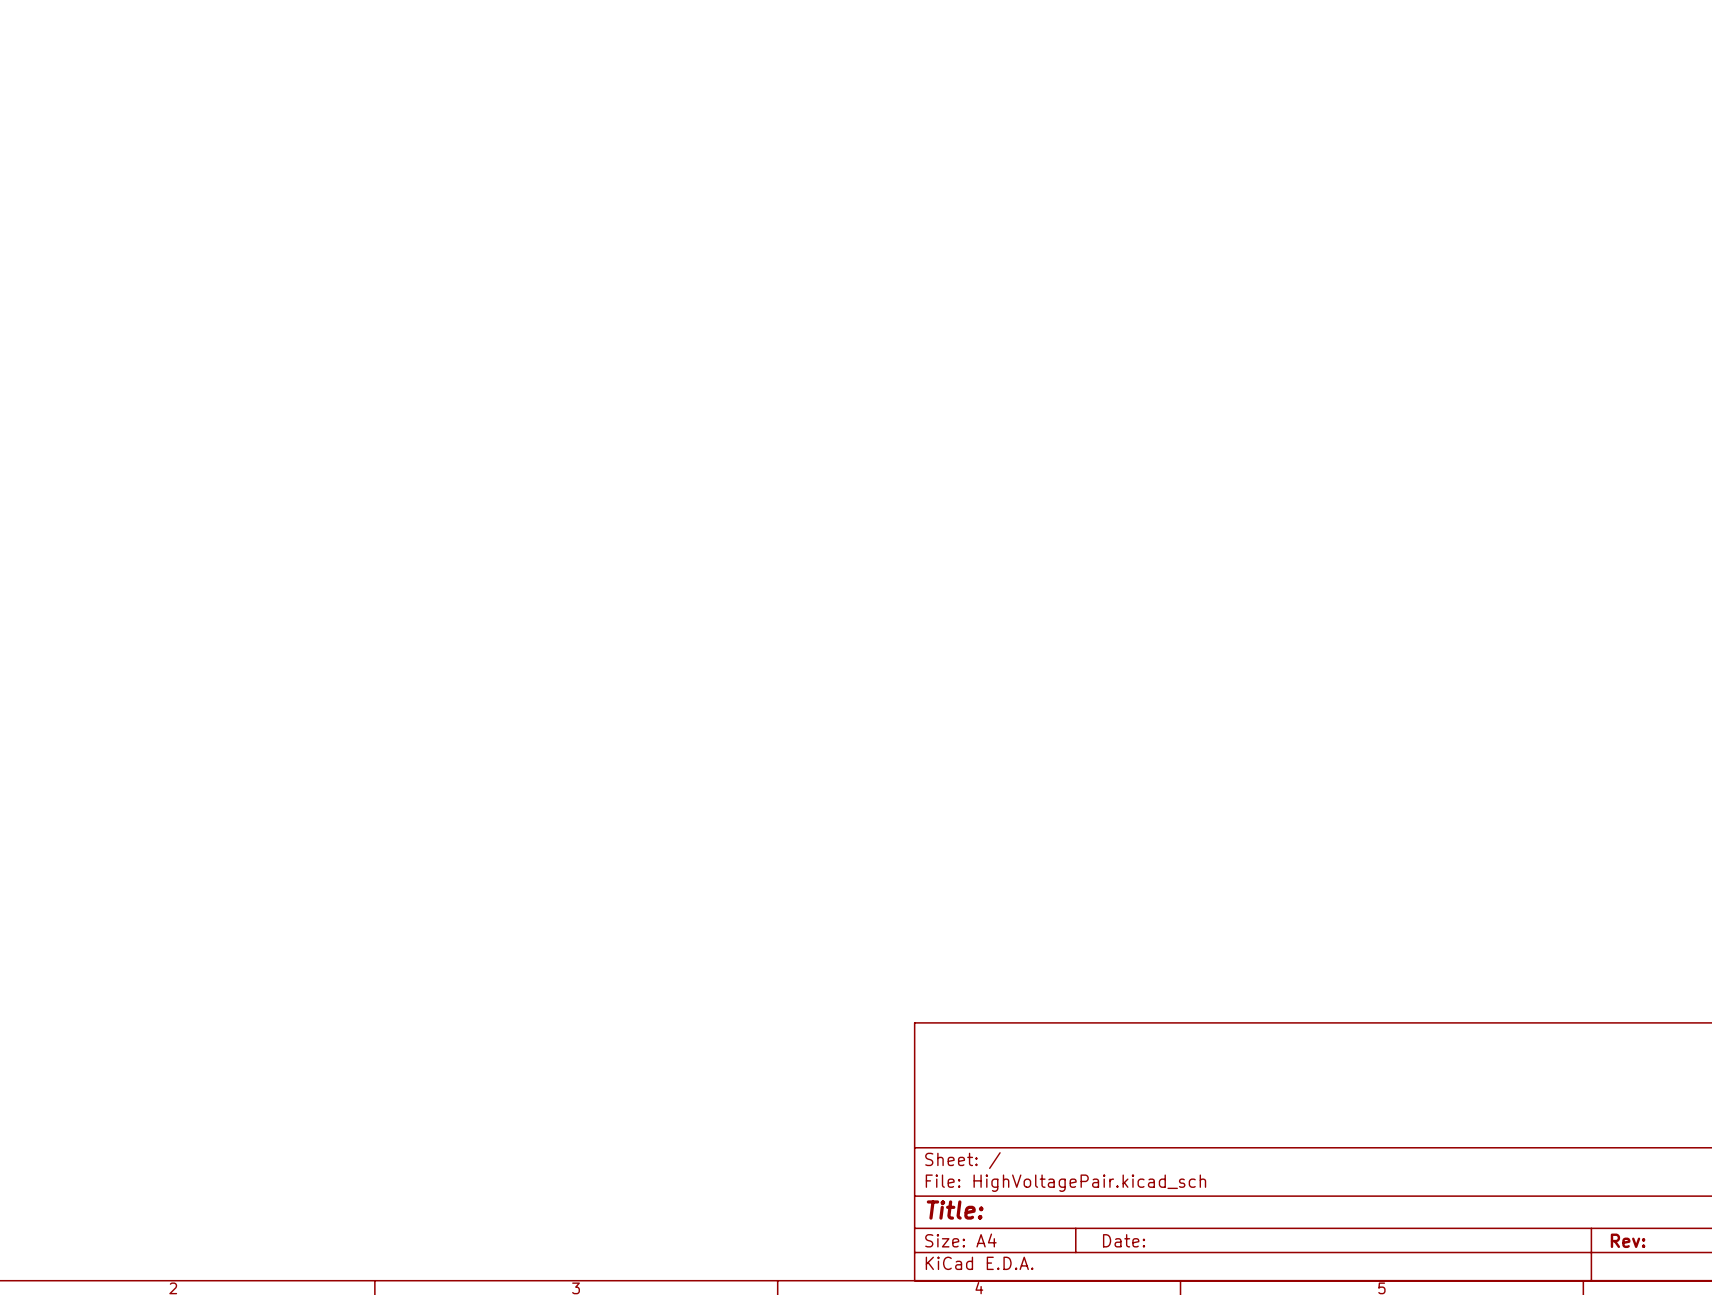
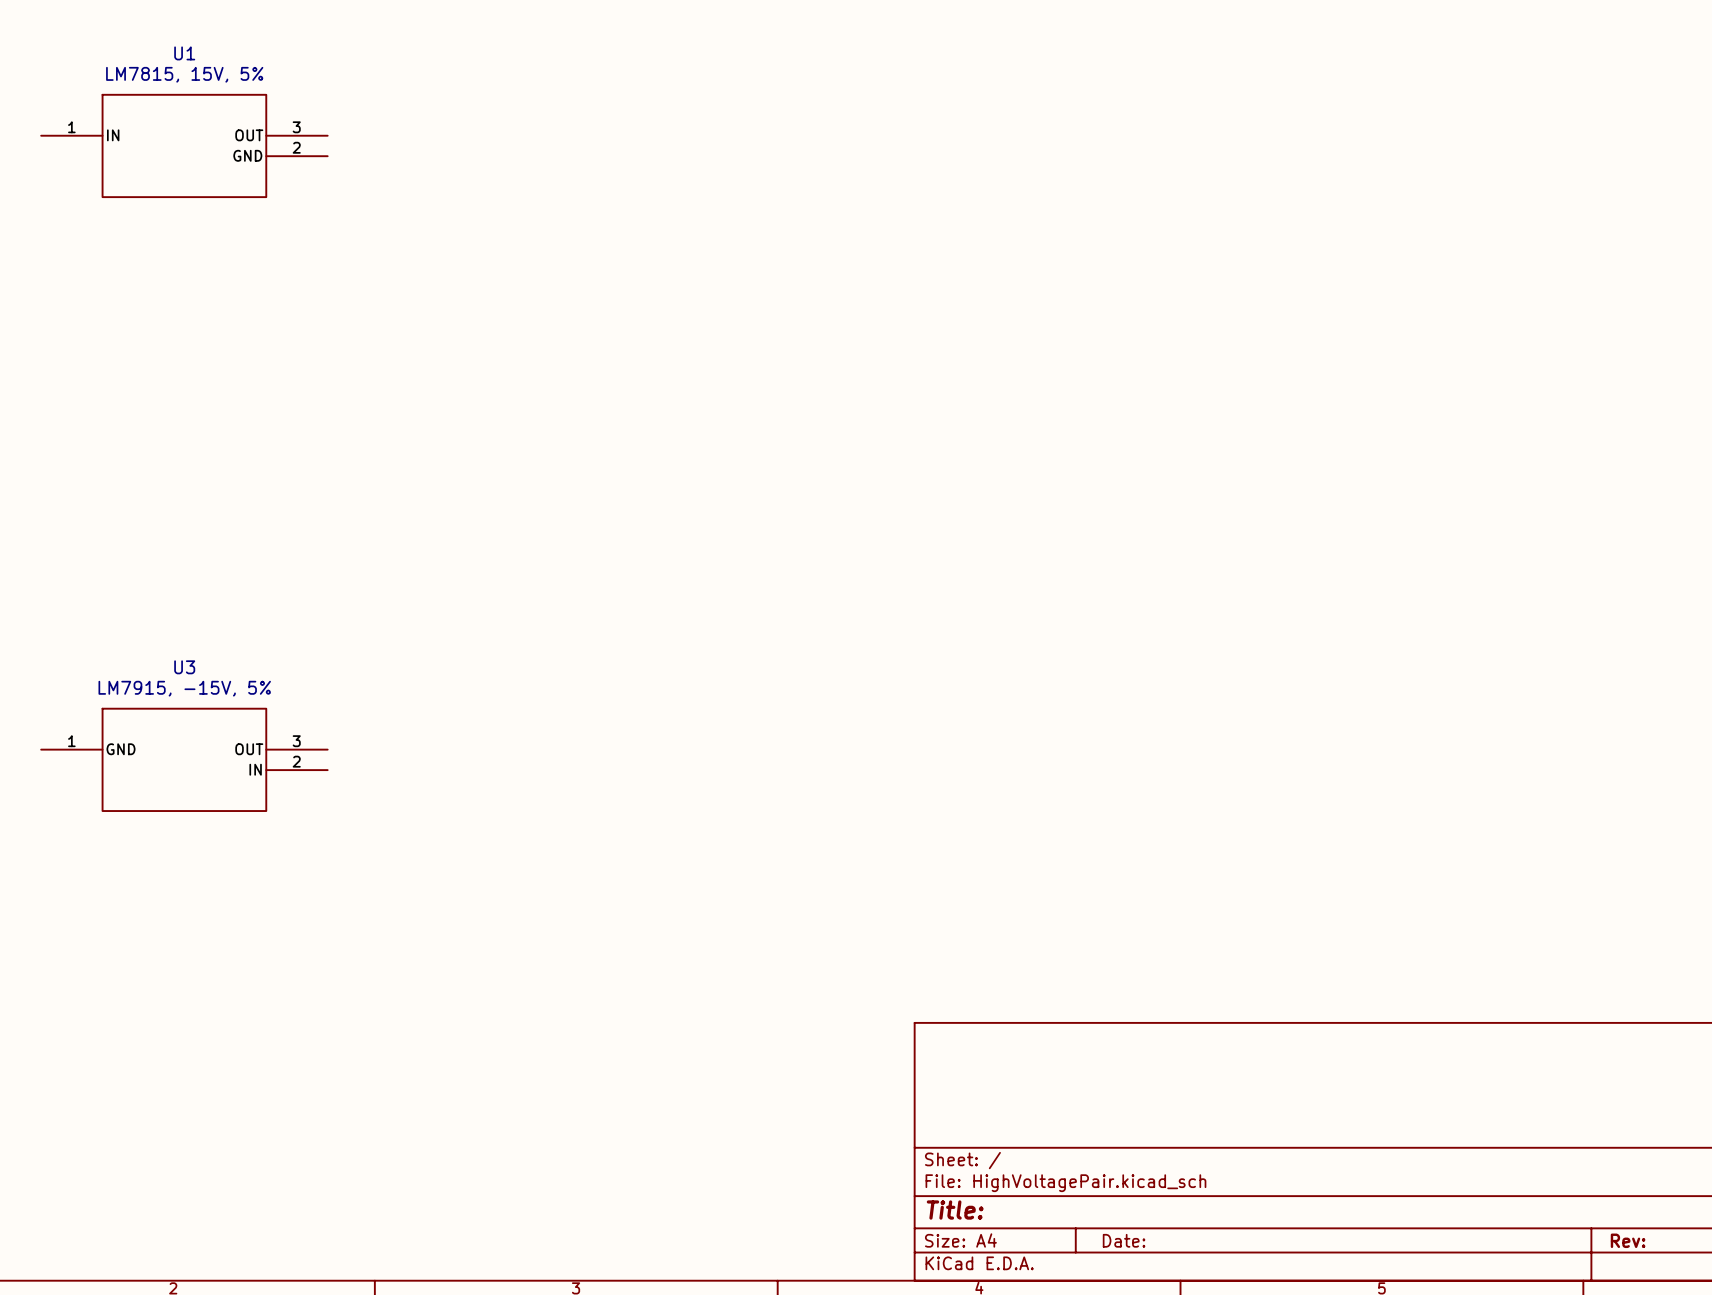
U1: none -> LM7815, 15V, 5% (184, 145)
U3: none -> LM7915, -15V, 5% (184, 759)

